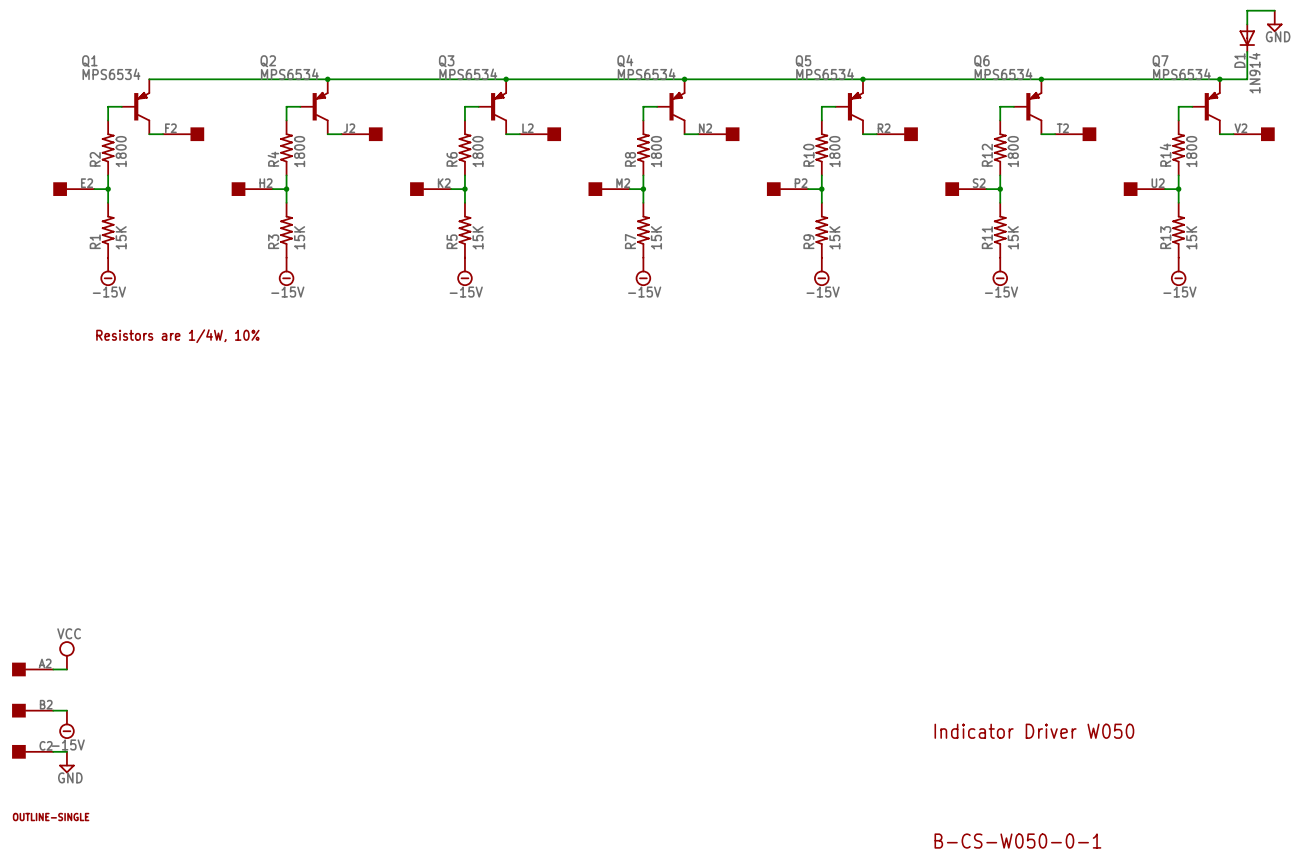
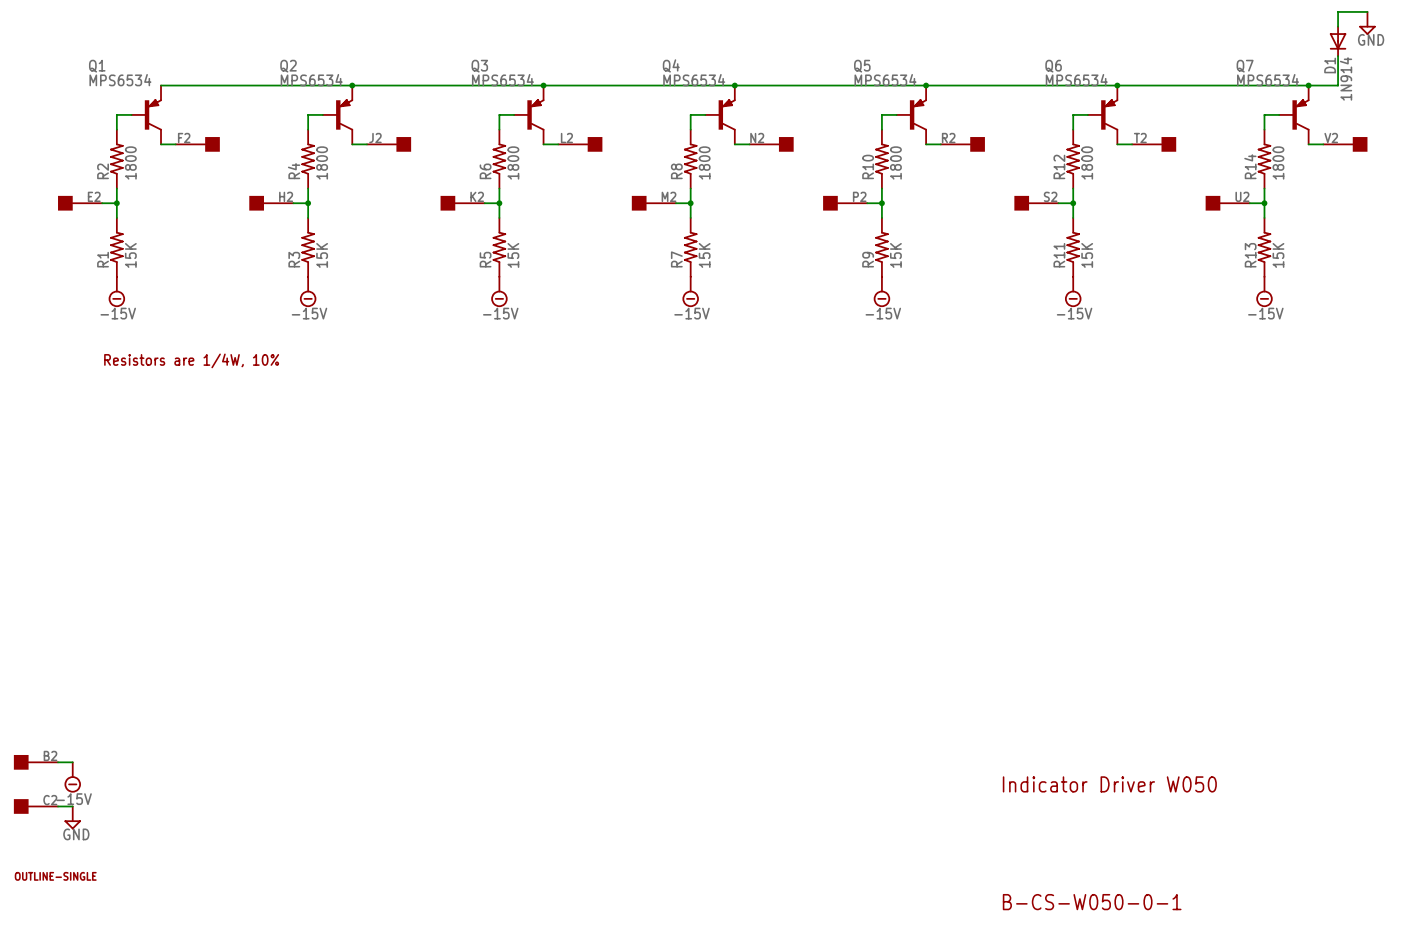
power symbol: VCC (66, 655) -> none
part: (32, 669) -> none
wire: (53, 669) (66, 669) -> none

